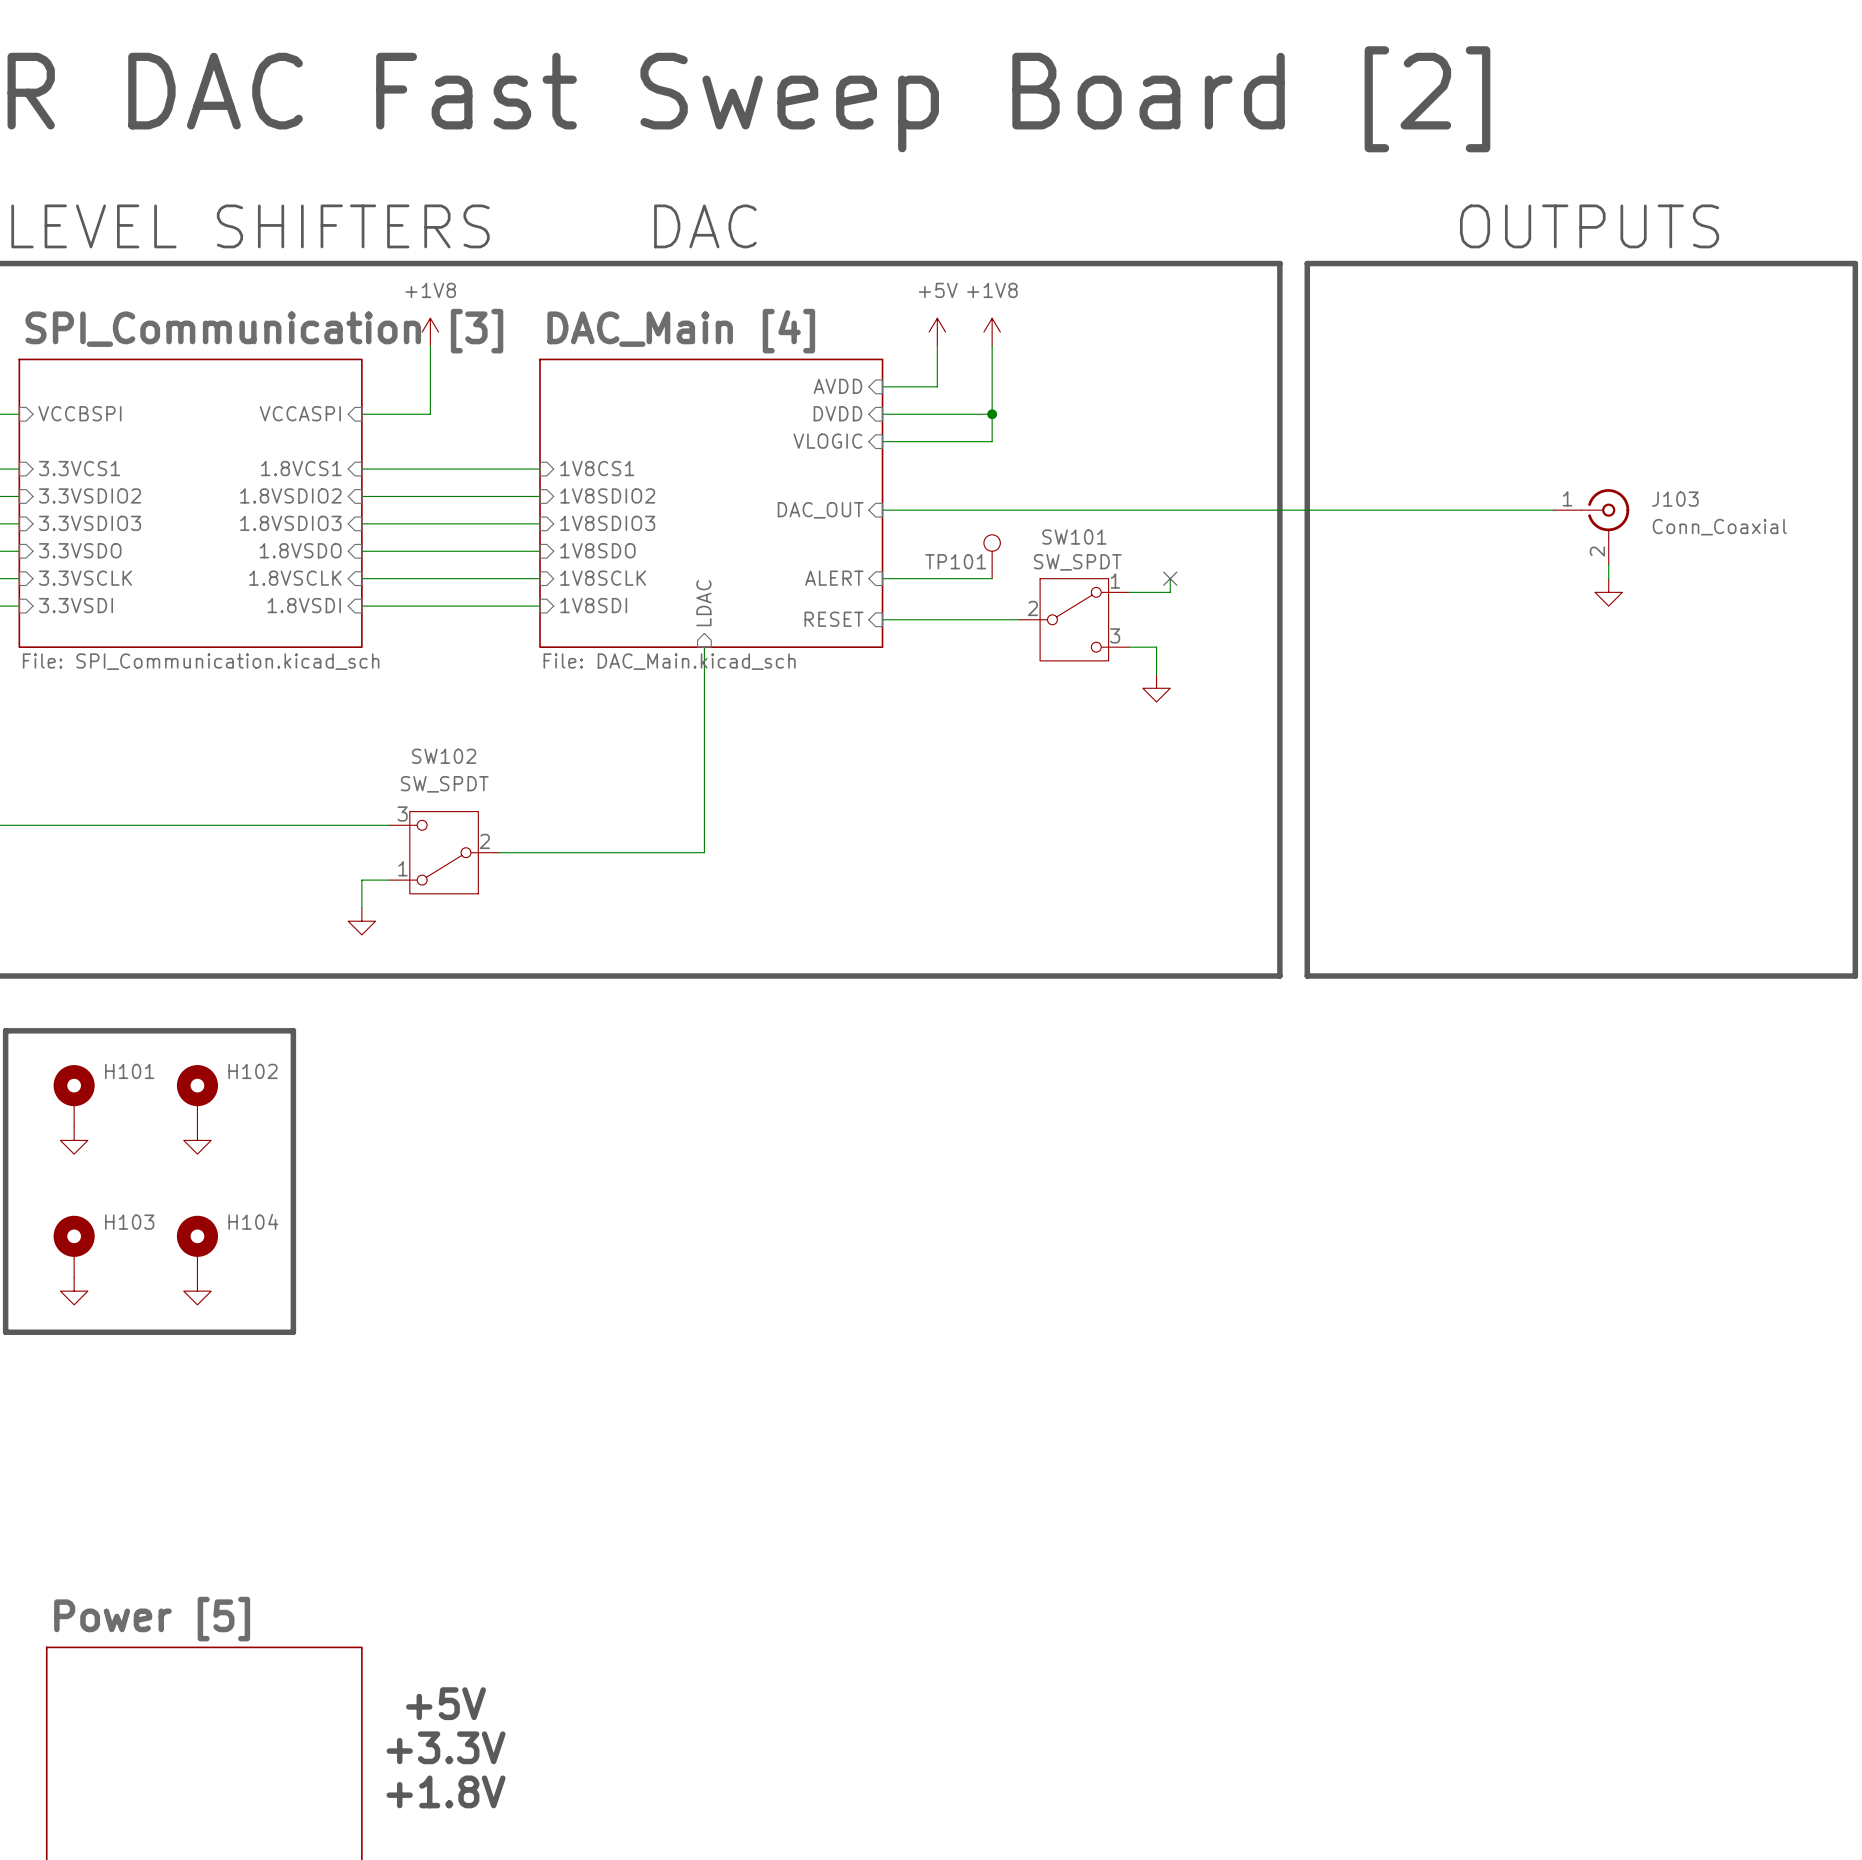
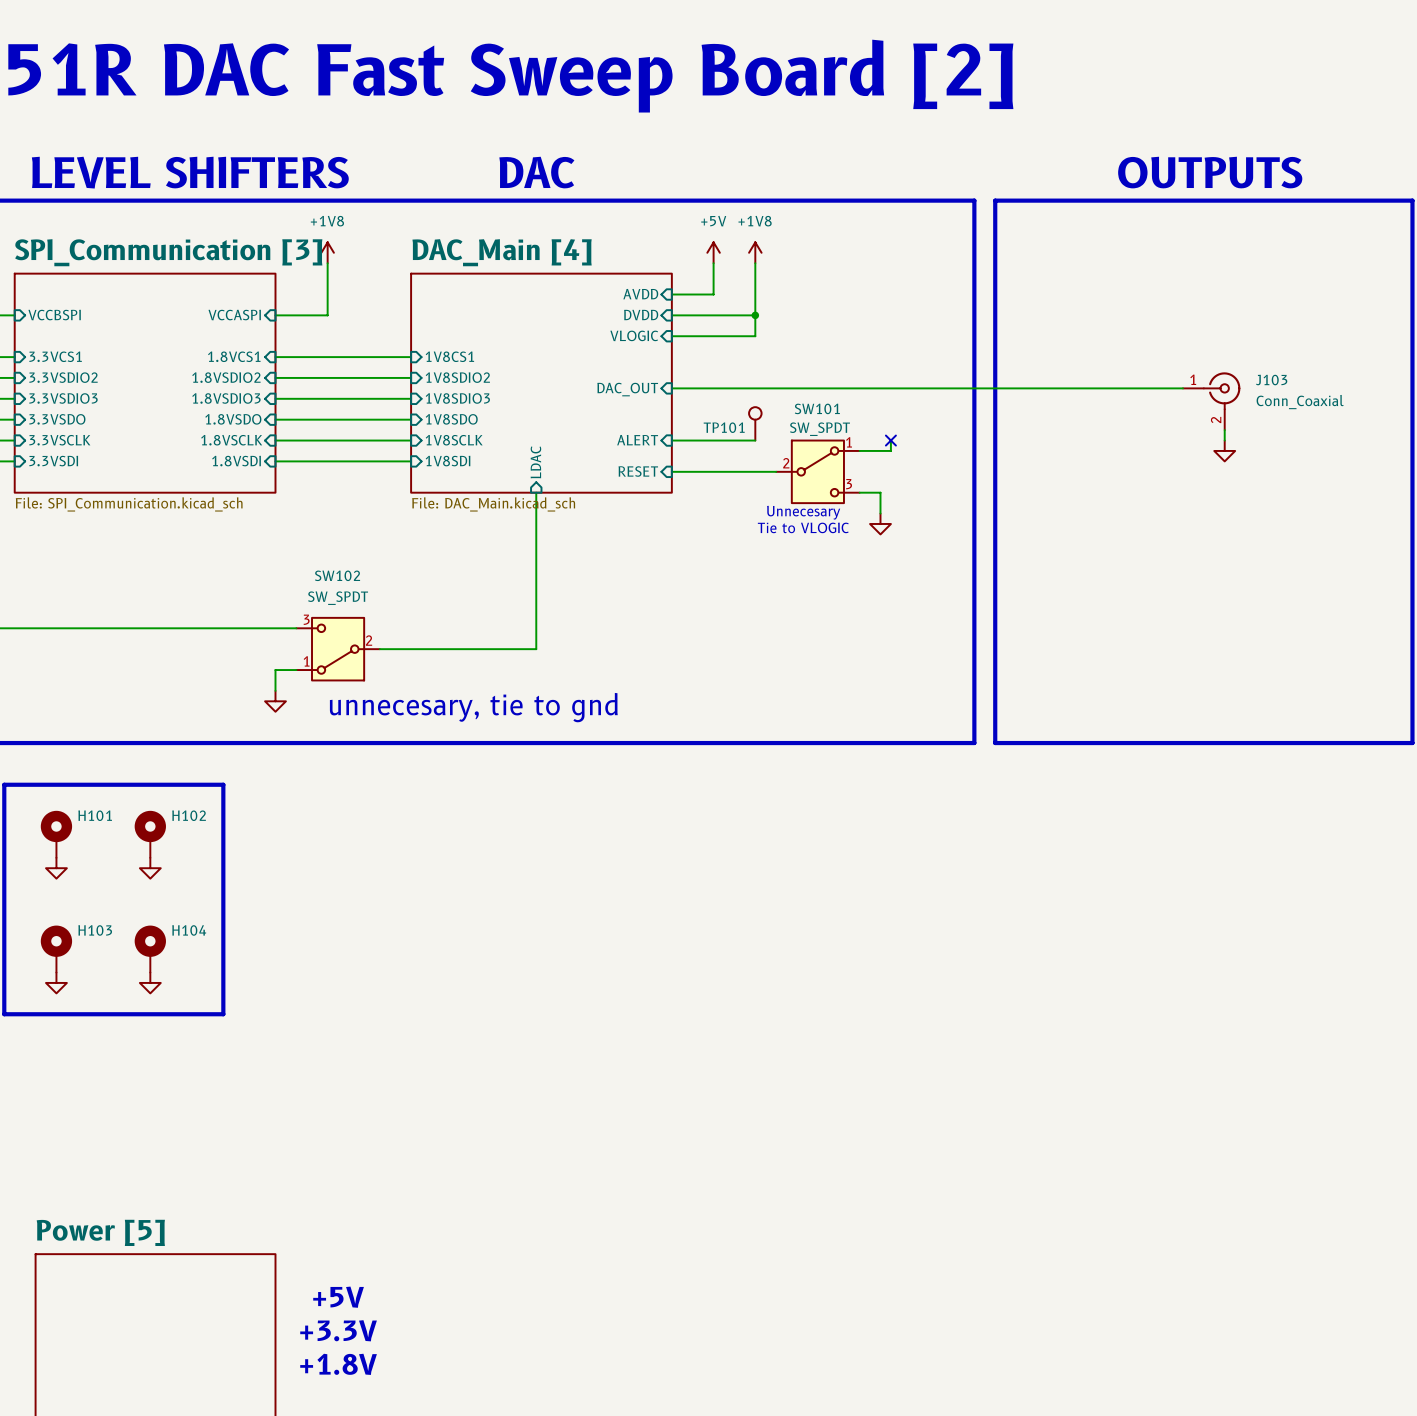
text: none -> Unnecesary (803, 512)
text: none -> Tie to VLOGIC (803, 527)
text: none -> unnecesary, tie to gnd (473, 707)

